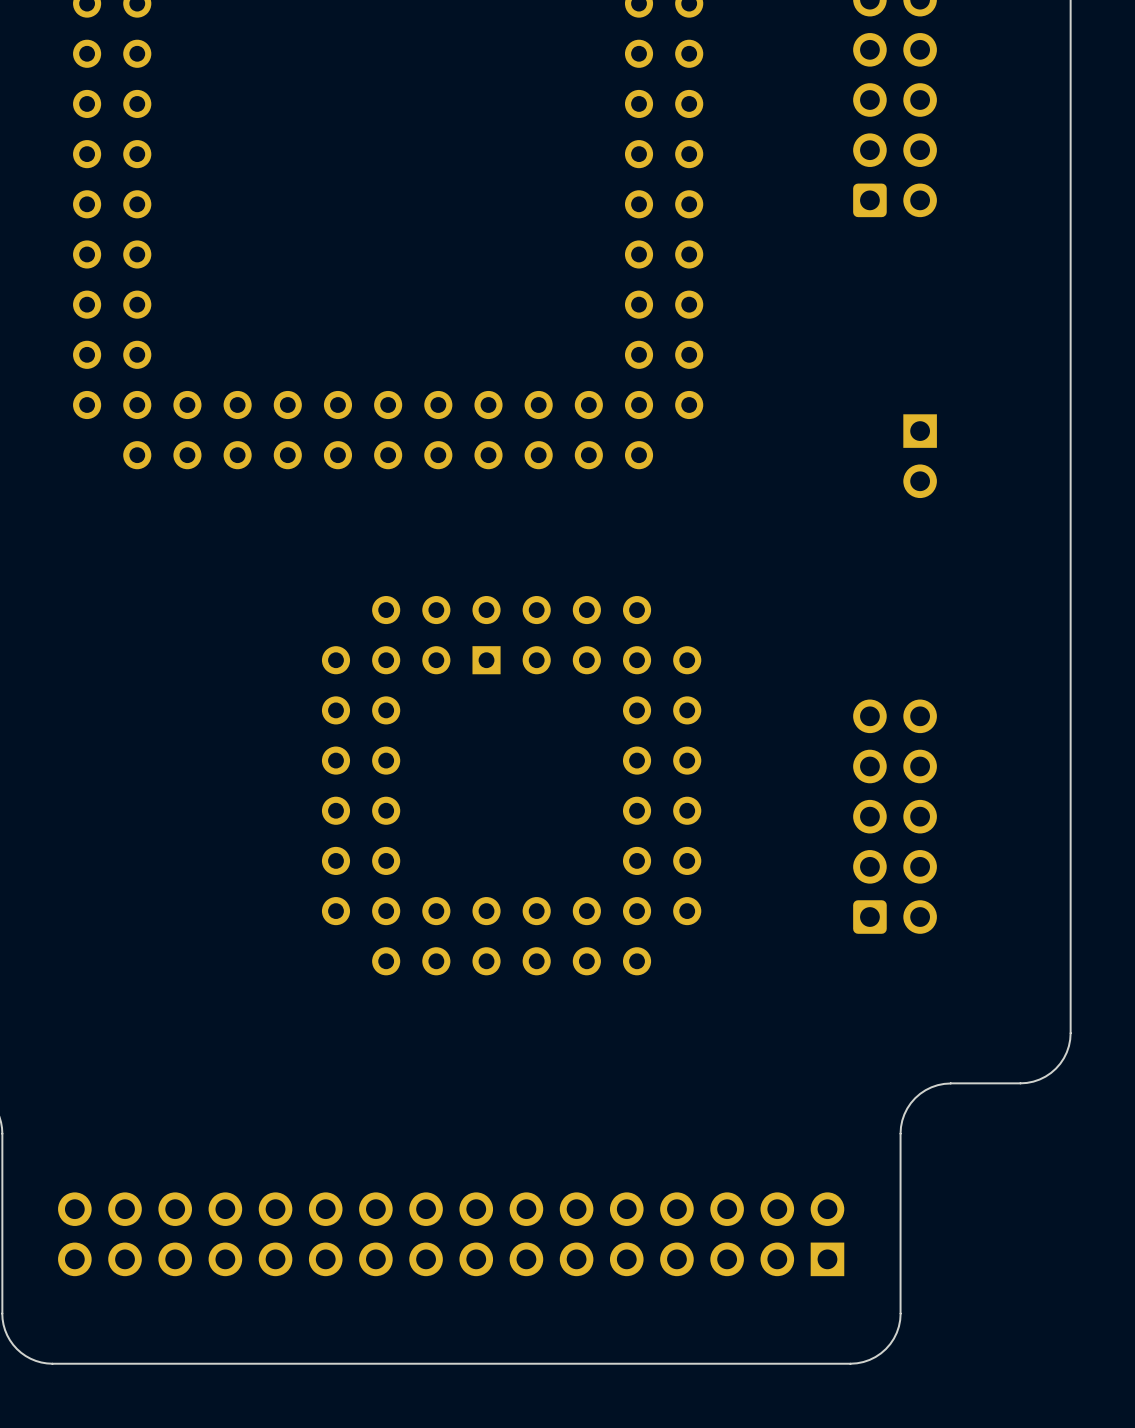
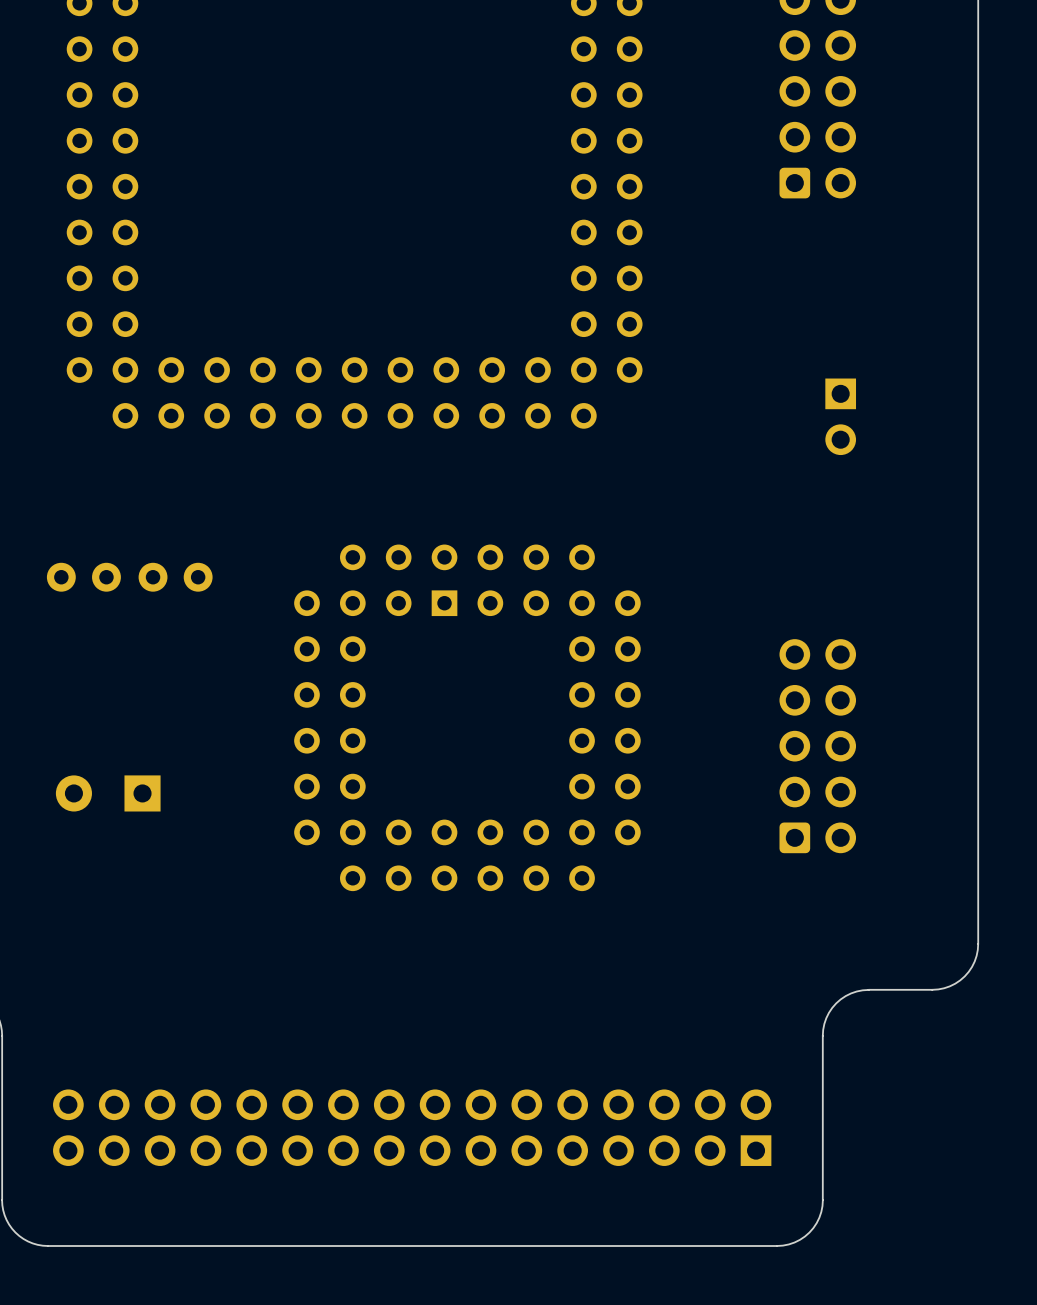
part: none -> (83, 577)
part: none -> (175, 577)
part: none -> (108, 793)

